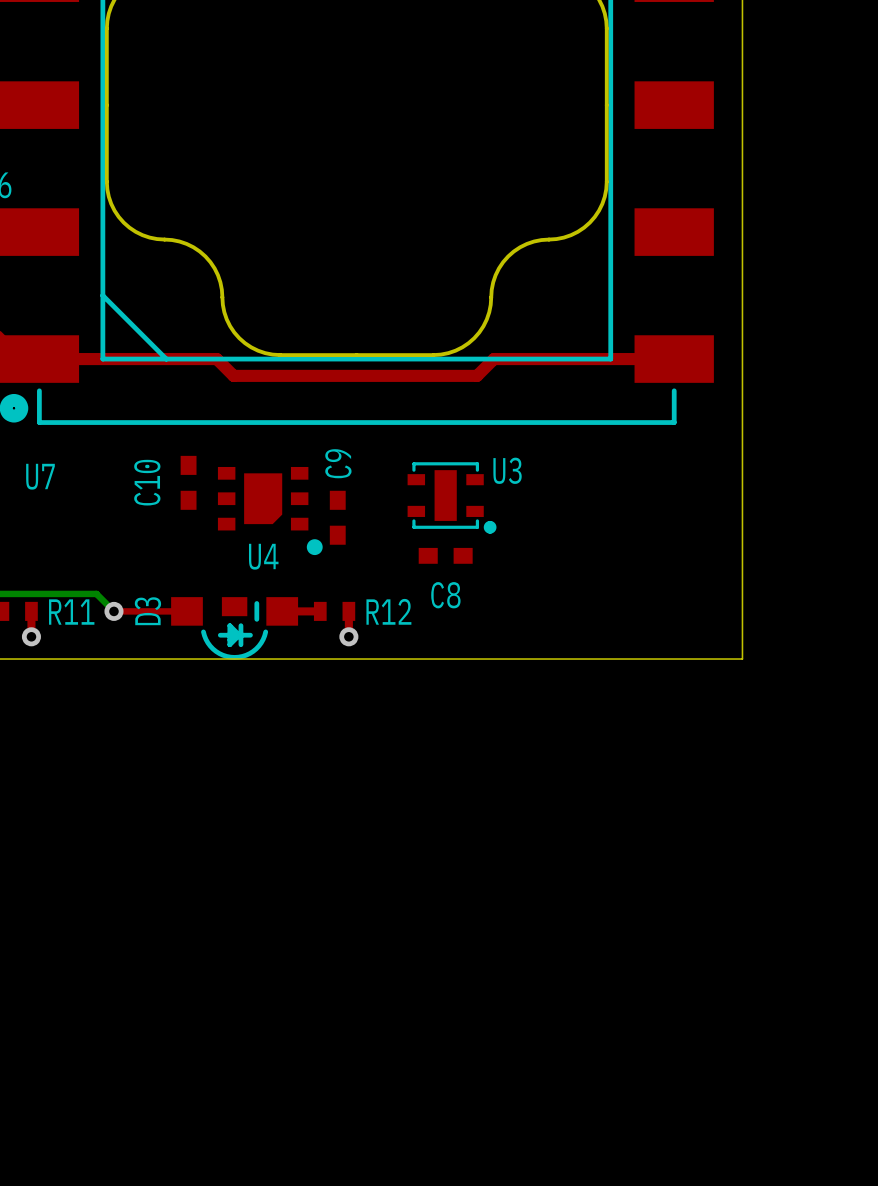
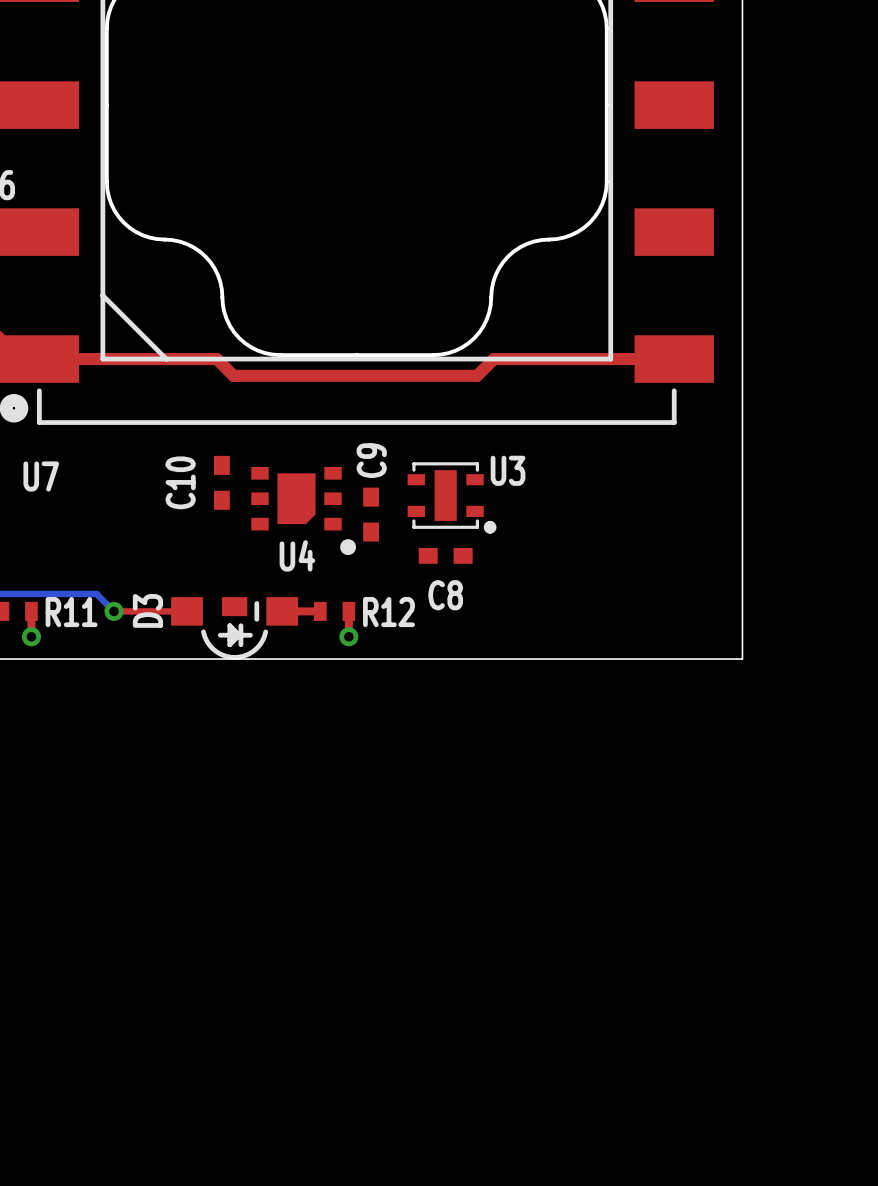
C10 position: (188, 482) -> (221, 482)
U4 position: (270, 511) -> (303, 511)
C9 position: (337, 517) -> (371, 514)

